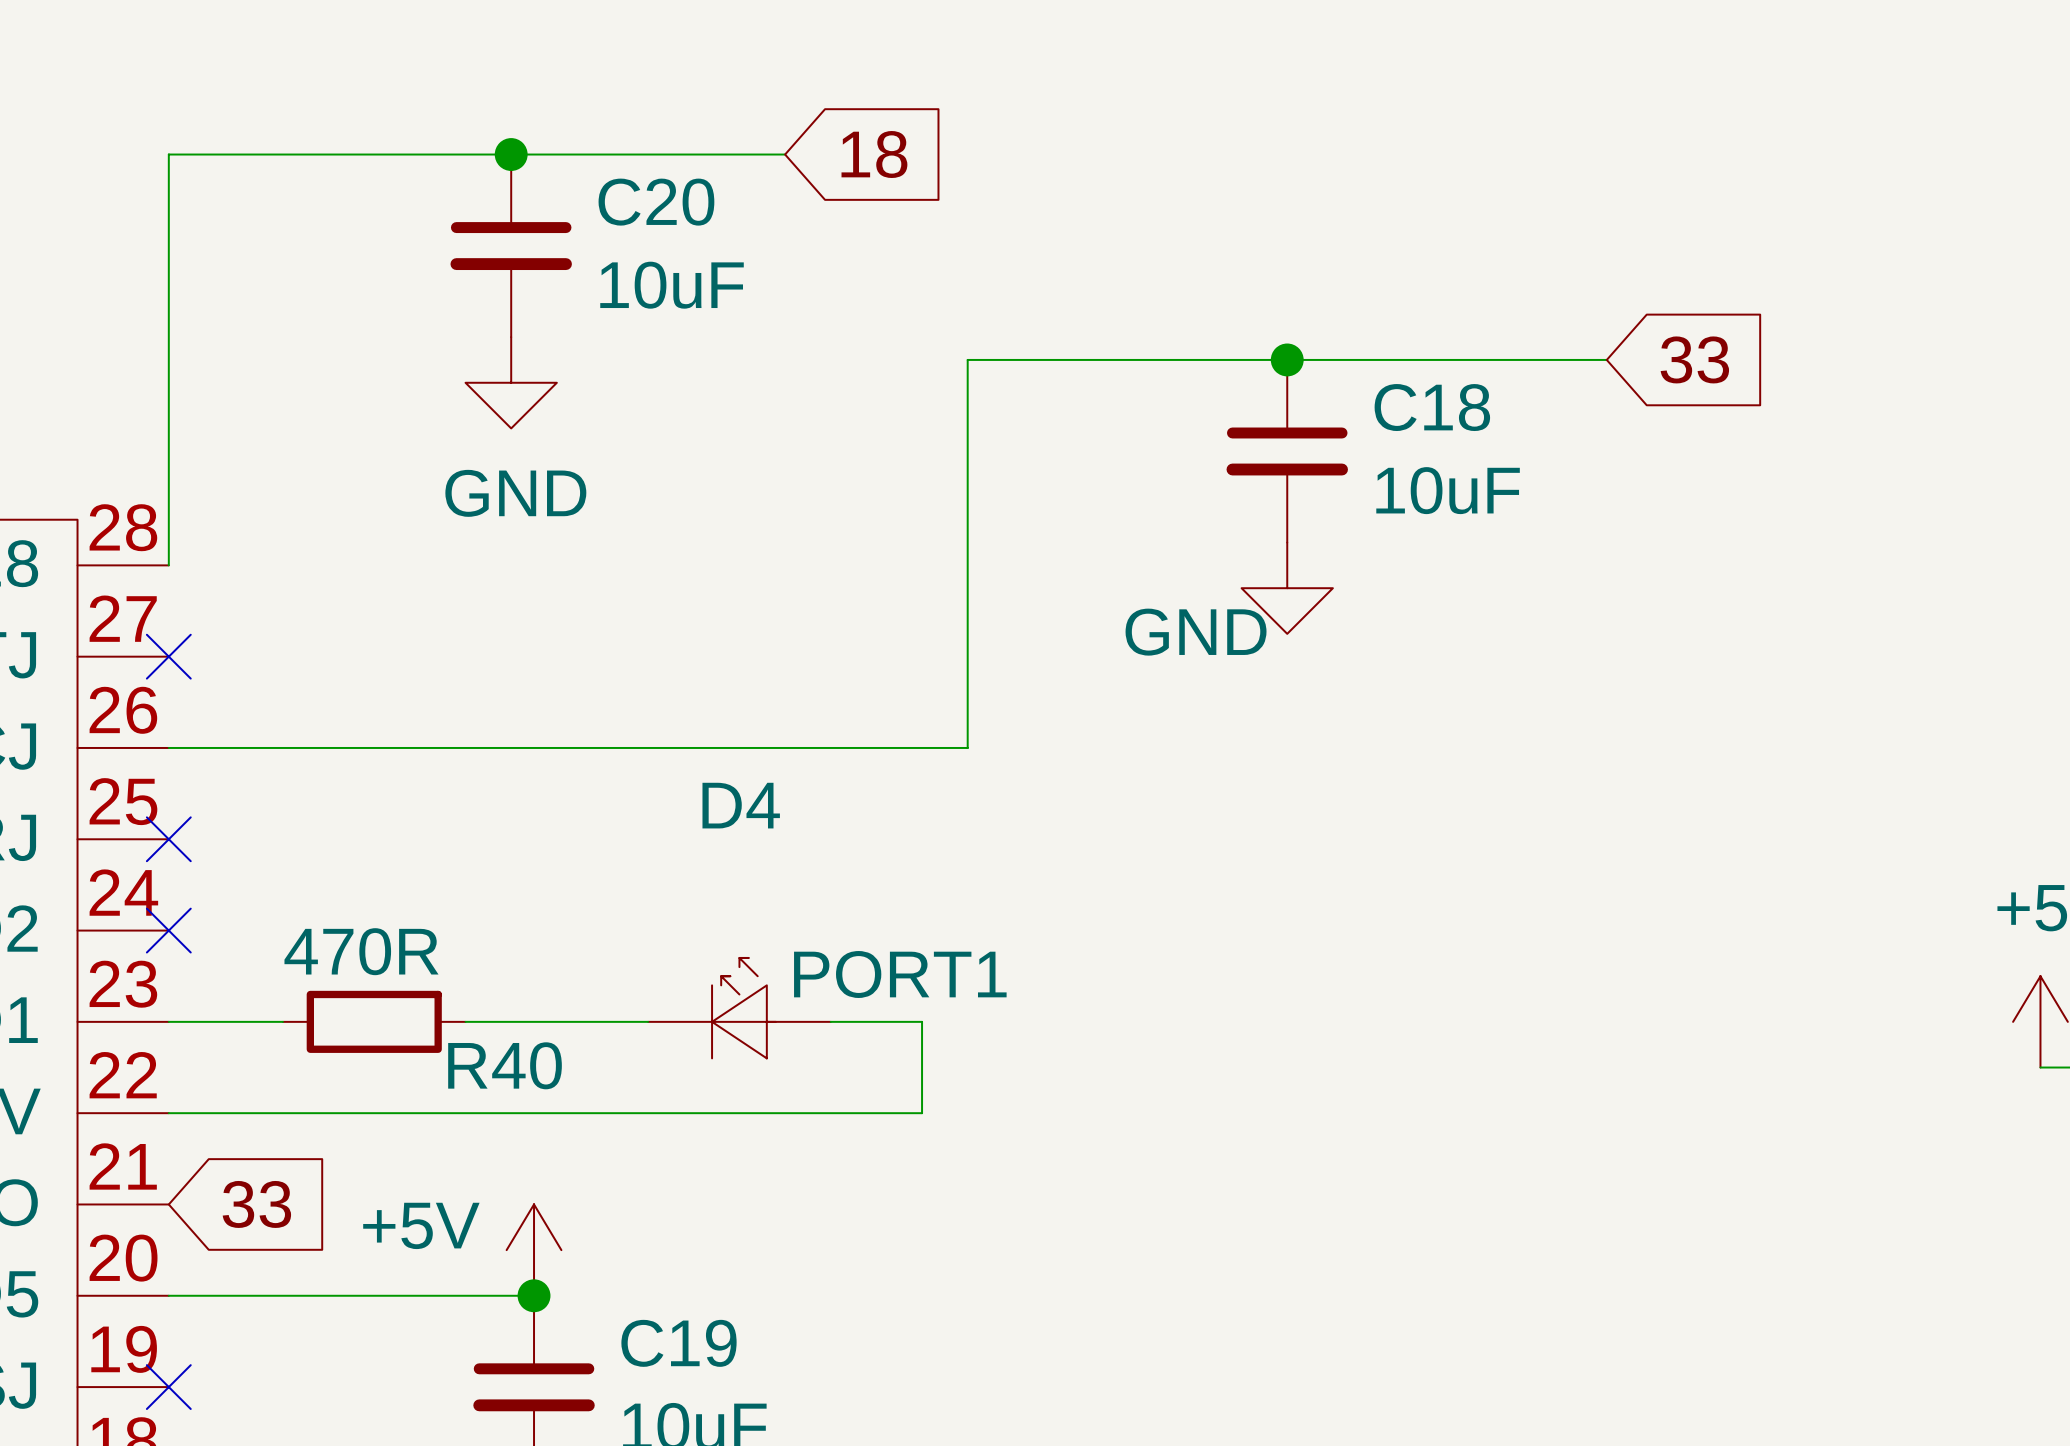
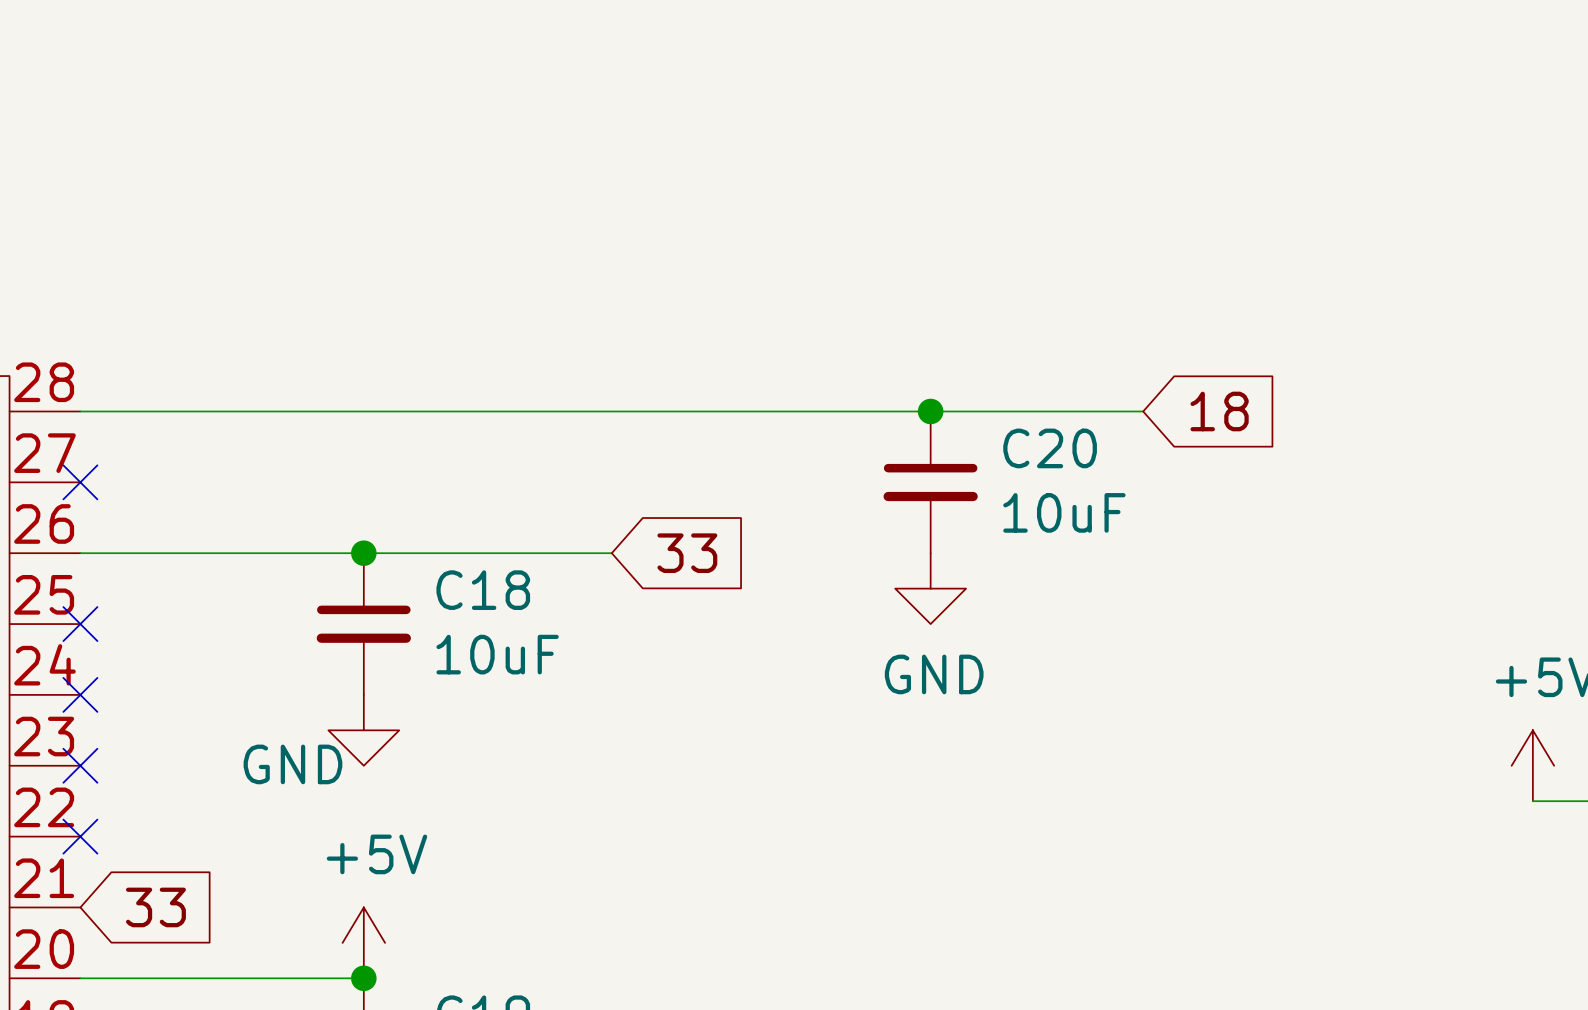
junction: (511, 154) -> none
wire: (785, 154) (168, 154) (168, 565) -> (1143, 411) (80, 411)
global label position: 18 (874, 154) -> 18 (1219, 411)
C20 position: (511, 245) -> (930, 482)
junction position: (1287, 359) -> (930, 411)
wire: (1606, 359) (967, 359) (967, 747) (853, 747) -> none
global label position: 33 (1694, 359) -> 33 (687, 553)
power symbol: GND (511, 382) -> none
C18 position: (1287, 451) -> (363, 624)
power symbol position: GND (1287, 588) -> GND (930, 588)
power symbol text position: GND (1196, 632) -> GND (934, 674)
junction: none -> (363, 553)
power symbol: none -> GND (363, 730)
D4: PORT1 (739, 1008) -> none
wire: (168, 1021) (282, 1021) -> none
no-connect mark: none -> (80, 765)
R40: 470R (374, 1021) -> none
wire: (465, 1021) (648, 1021) -> none
wire: (830, 1021) (922, 1021) (922, 1113) (168, 1113) -> none
no-connect mark: none -> (80, 836)
power symbol text position: +5V (421, 1225) -> +5V (376, 854)

